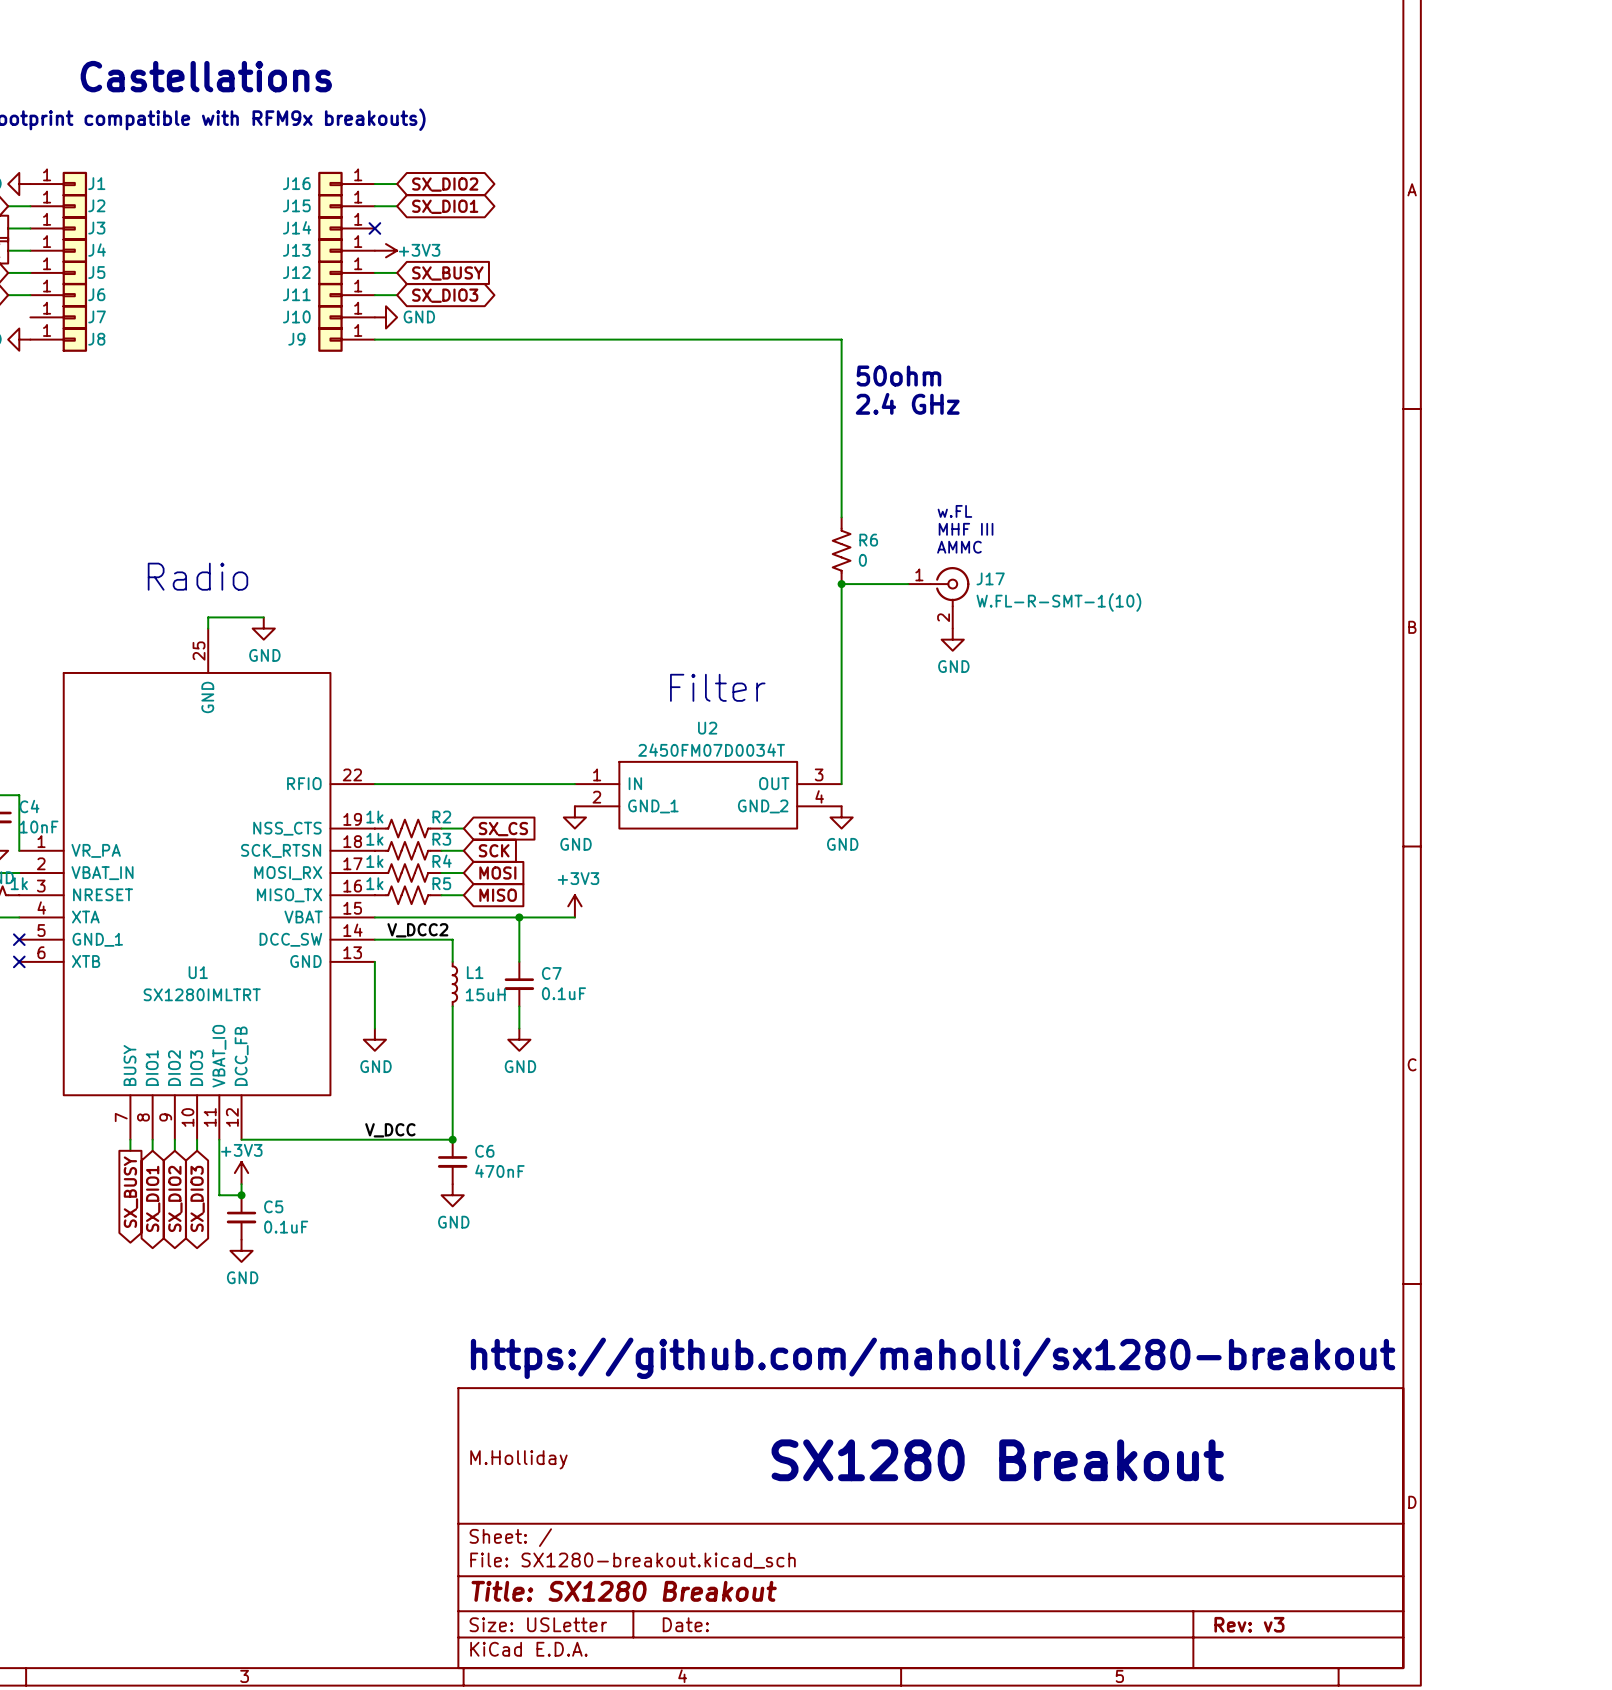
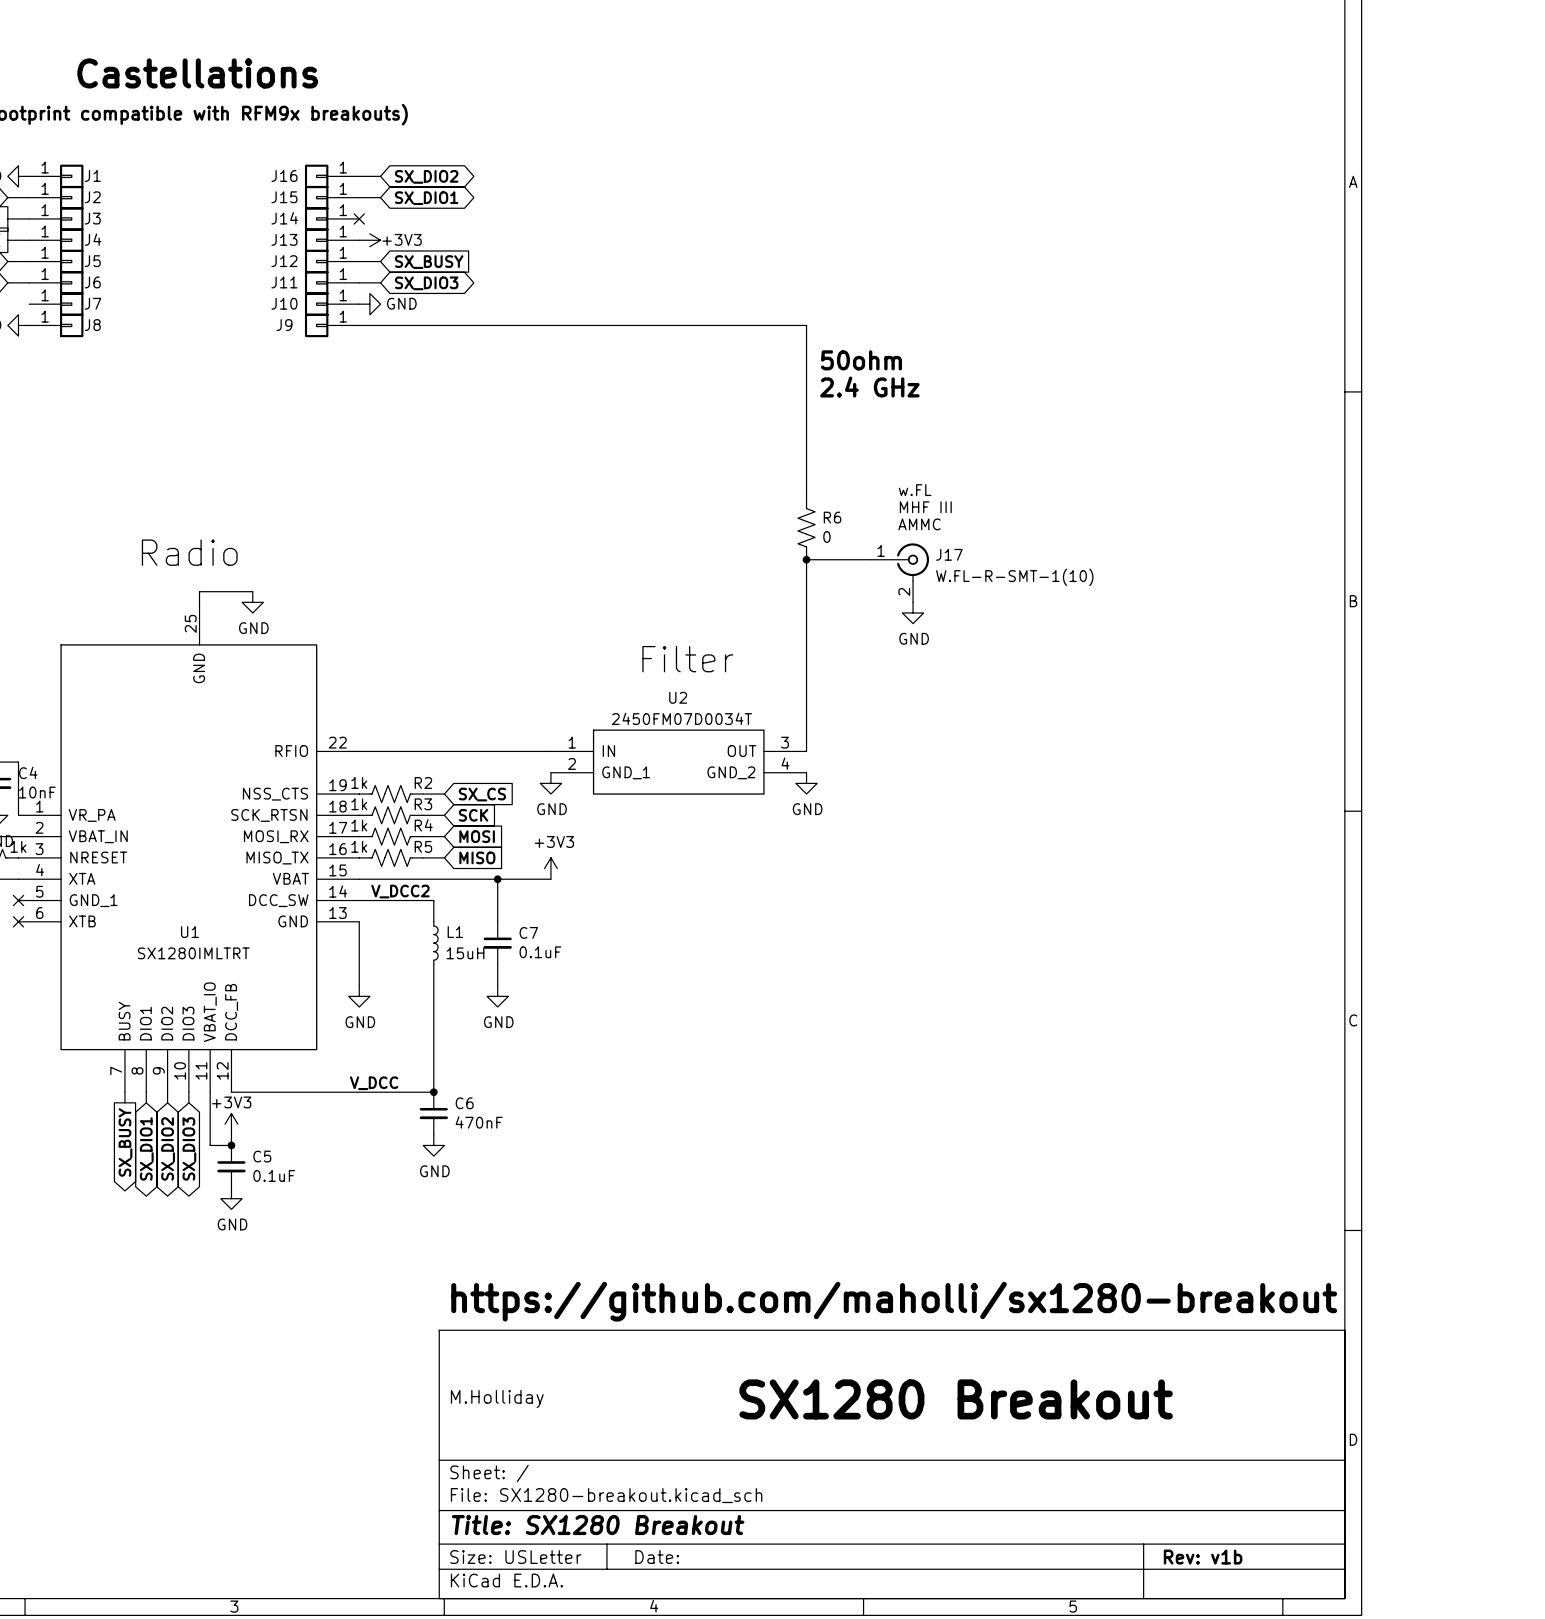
title block: Rev: v3 (1249, 1624) -> Rev: v1b (1203, 1557)

